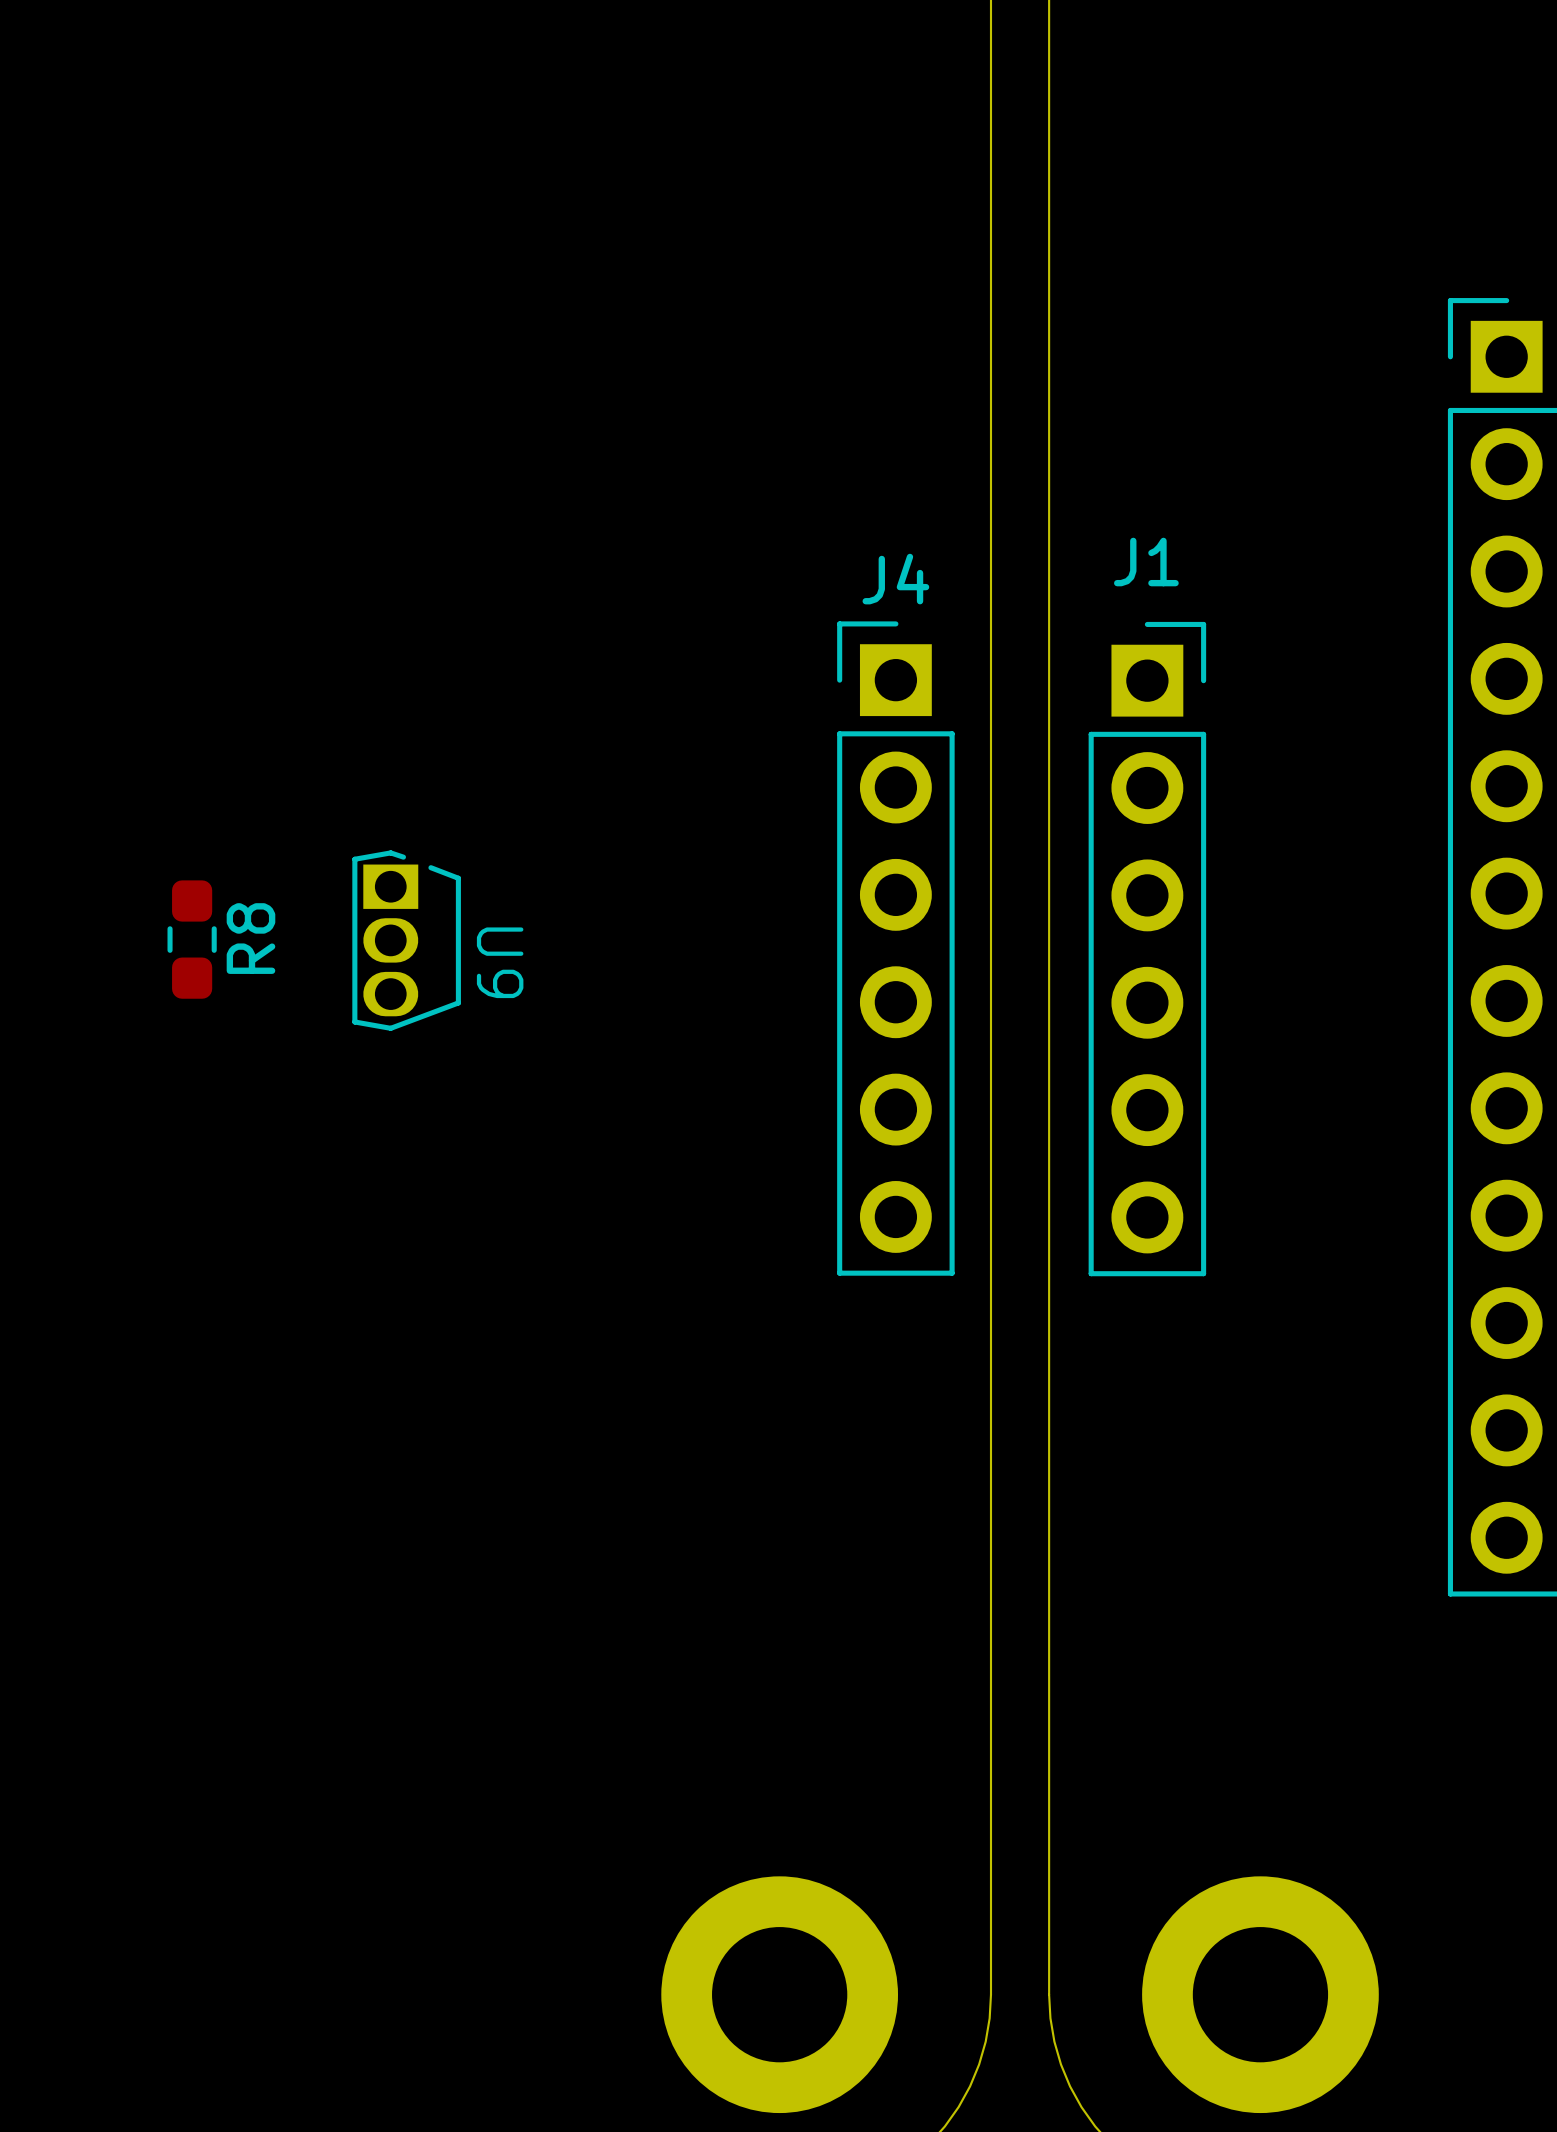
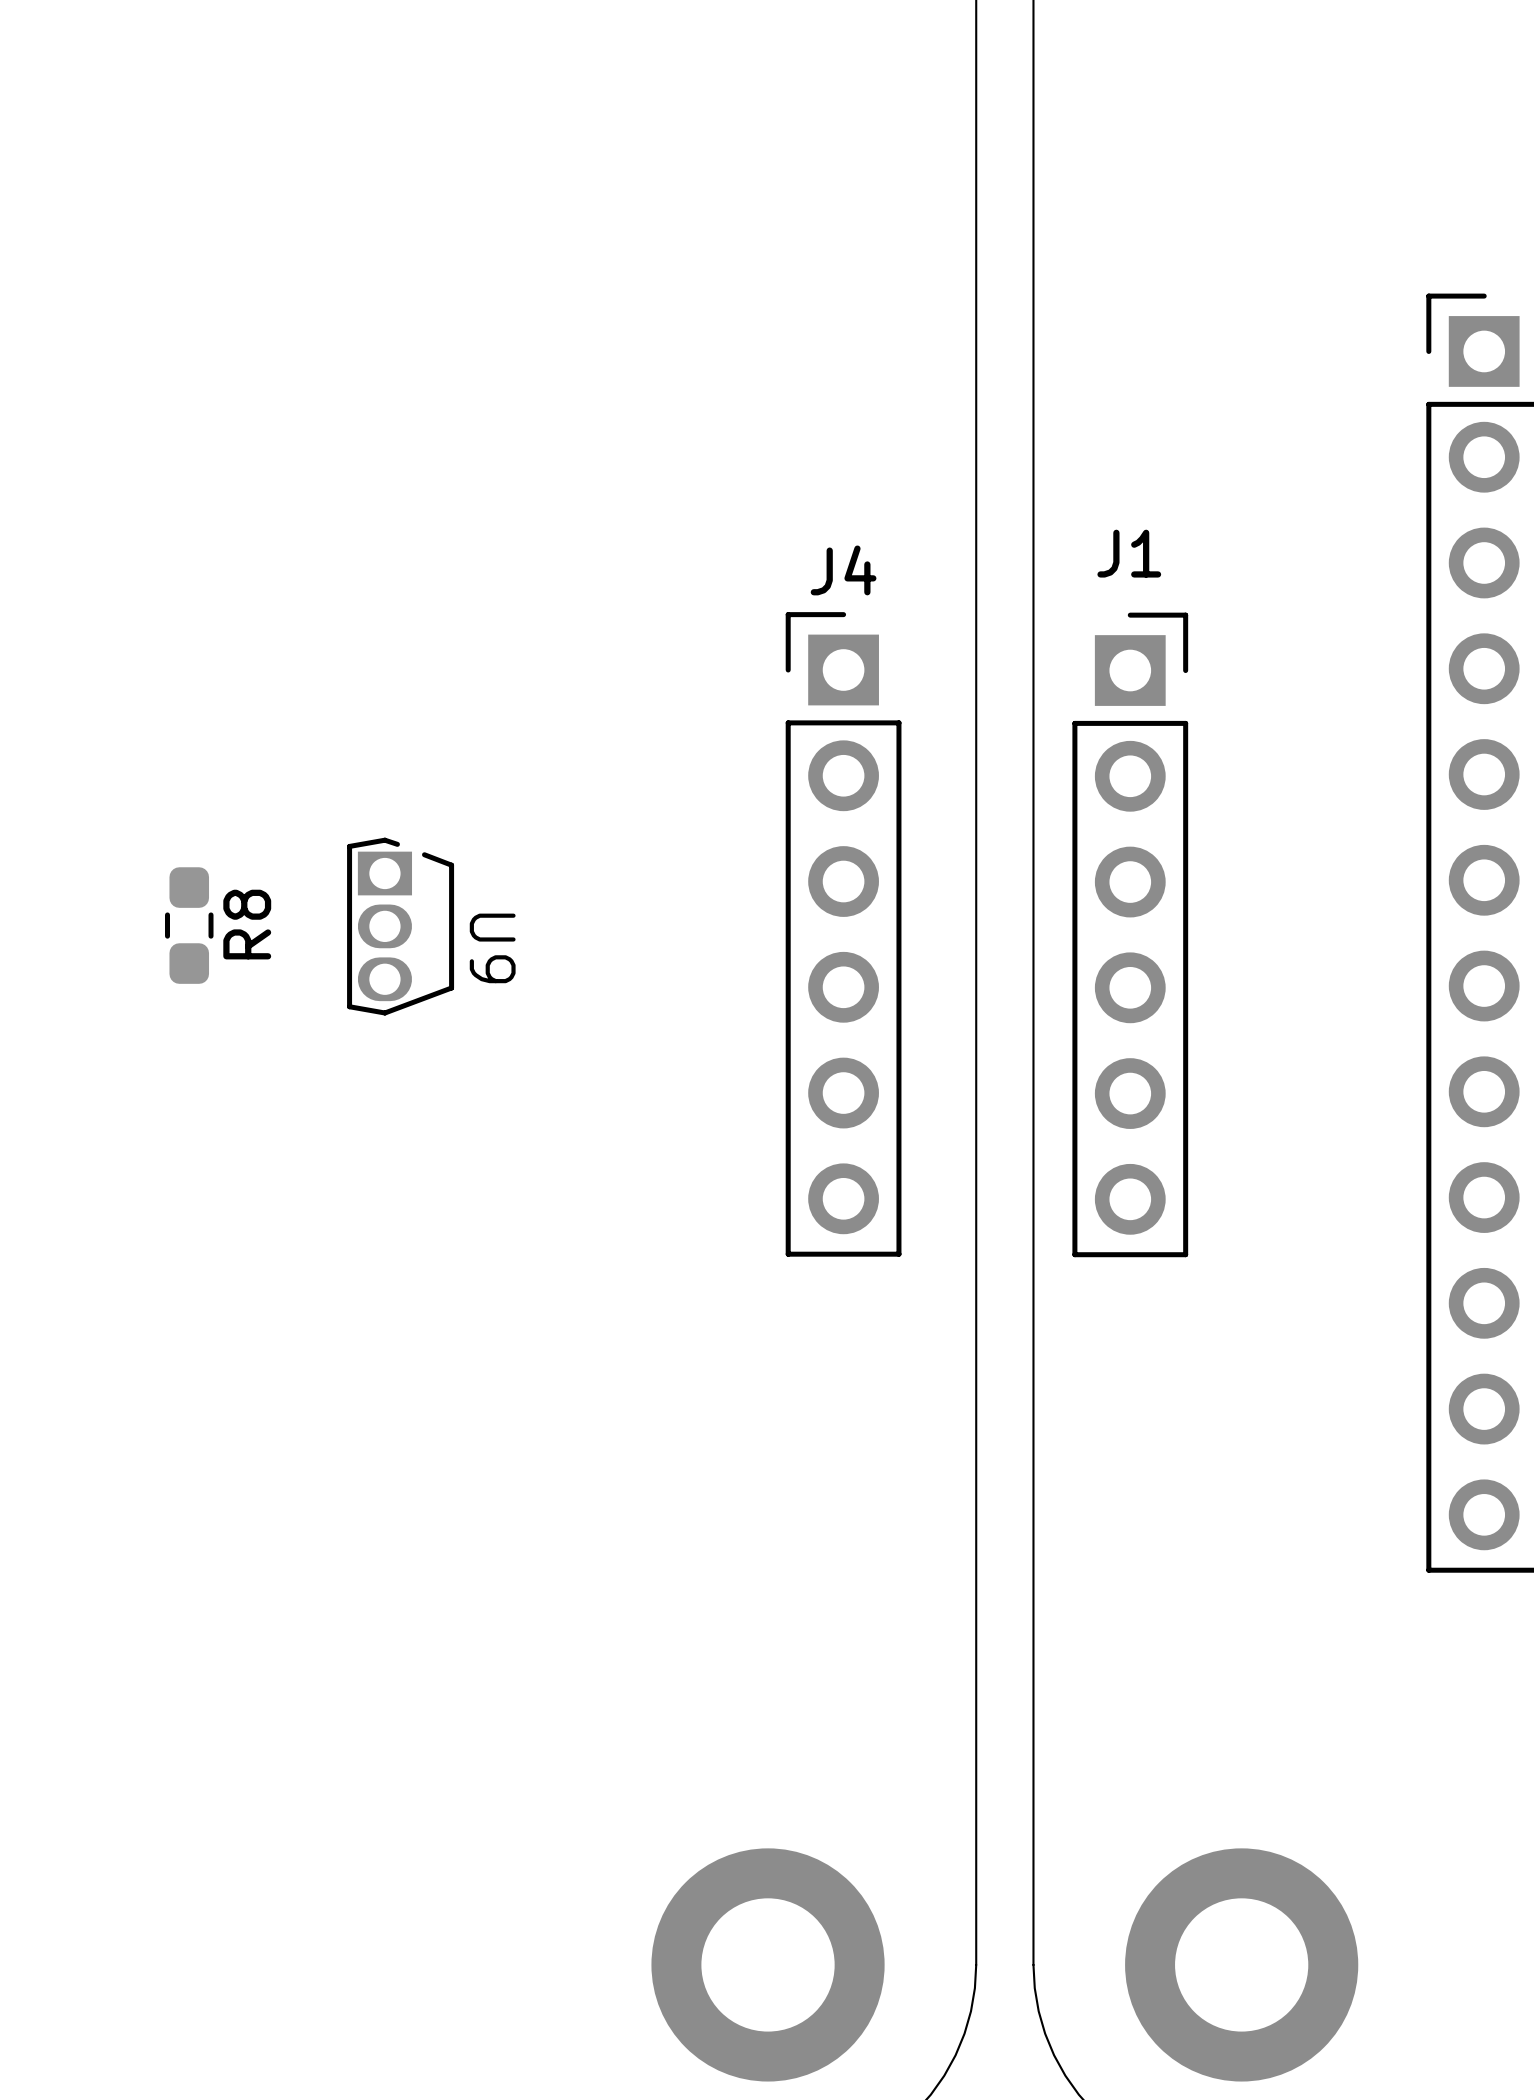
J4 position: (895, 948) -> (843, 934)

